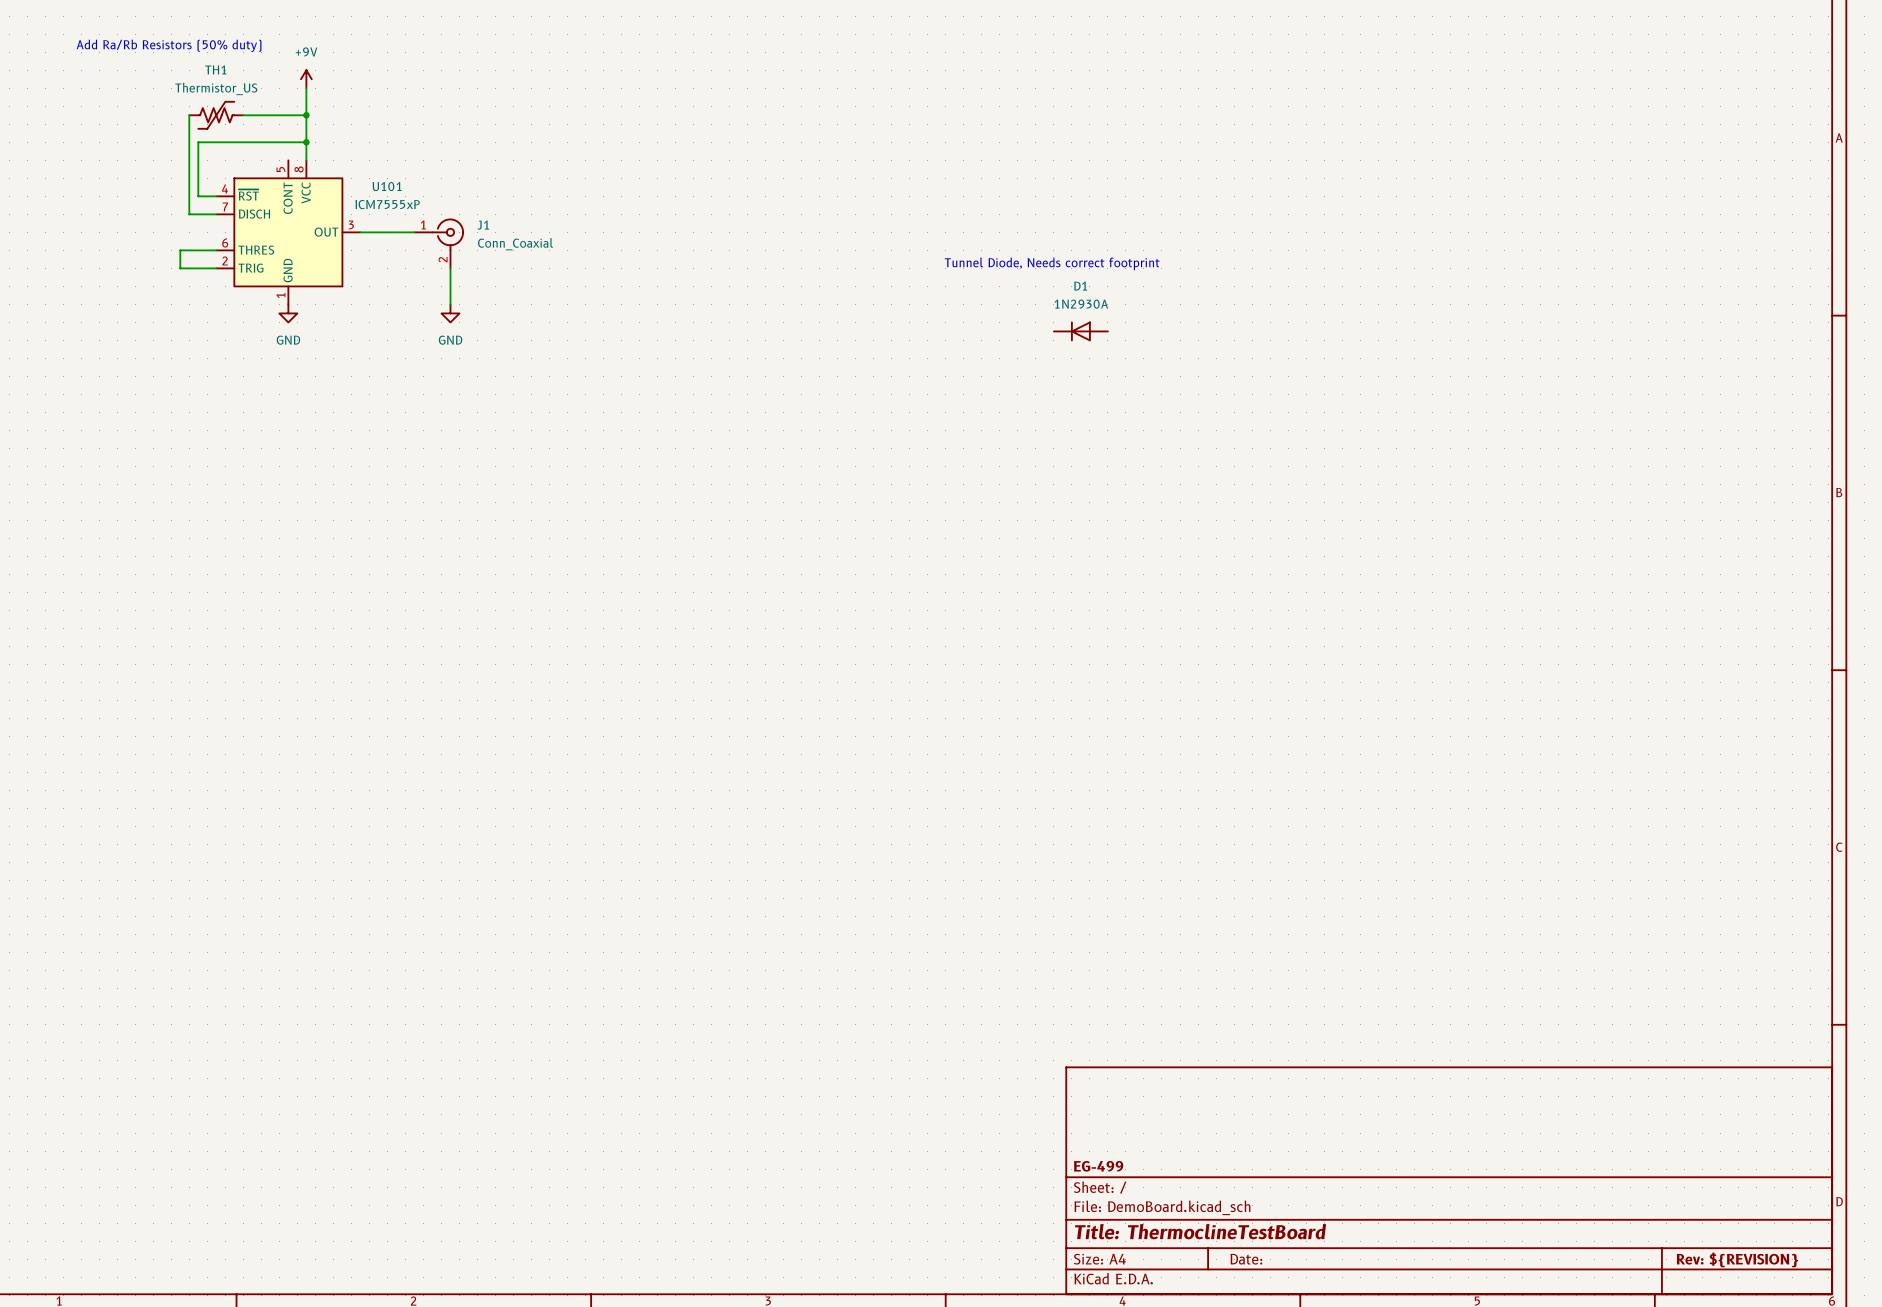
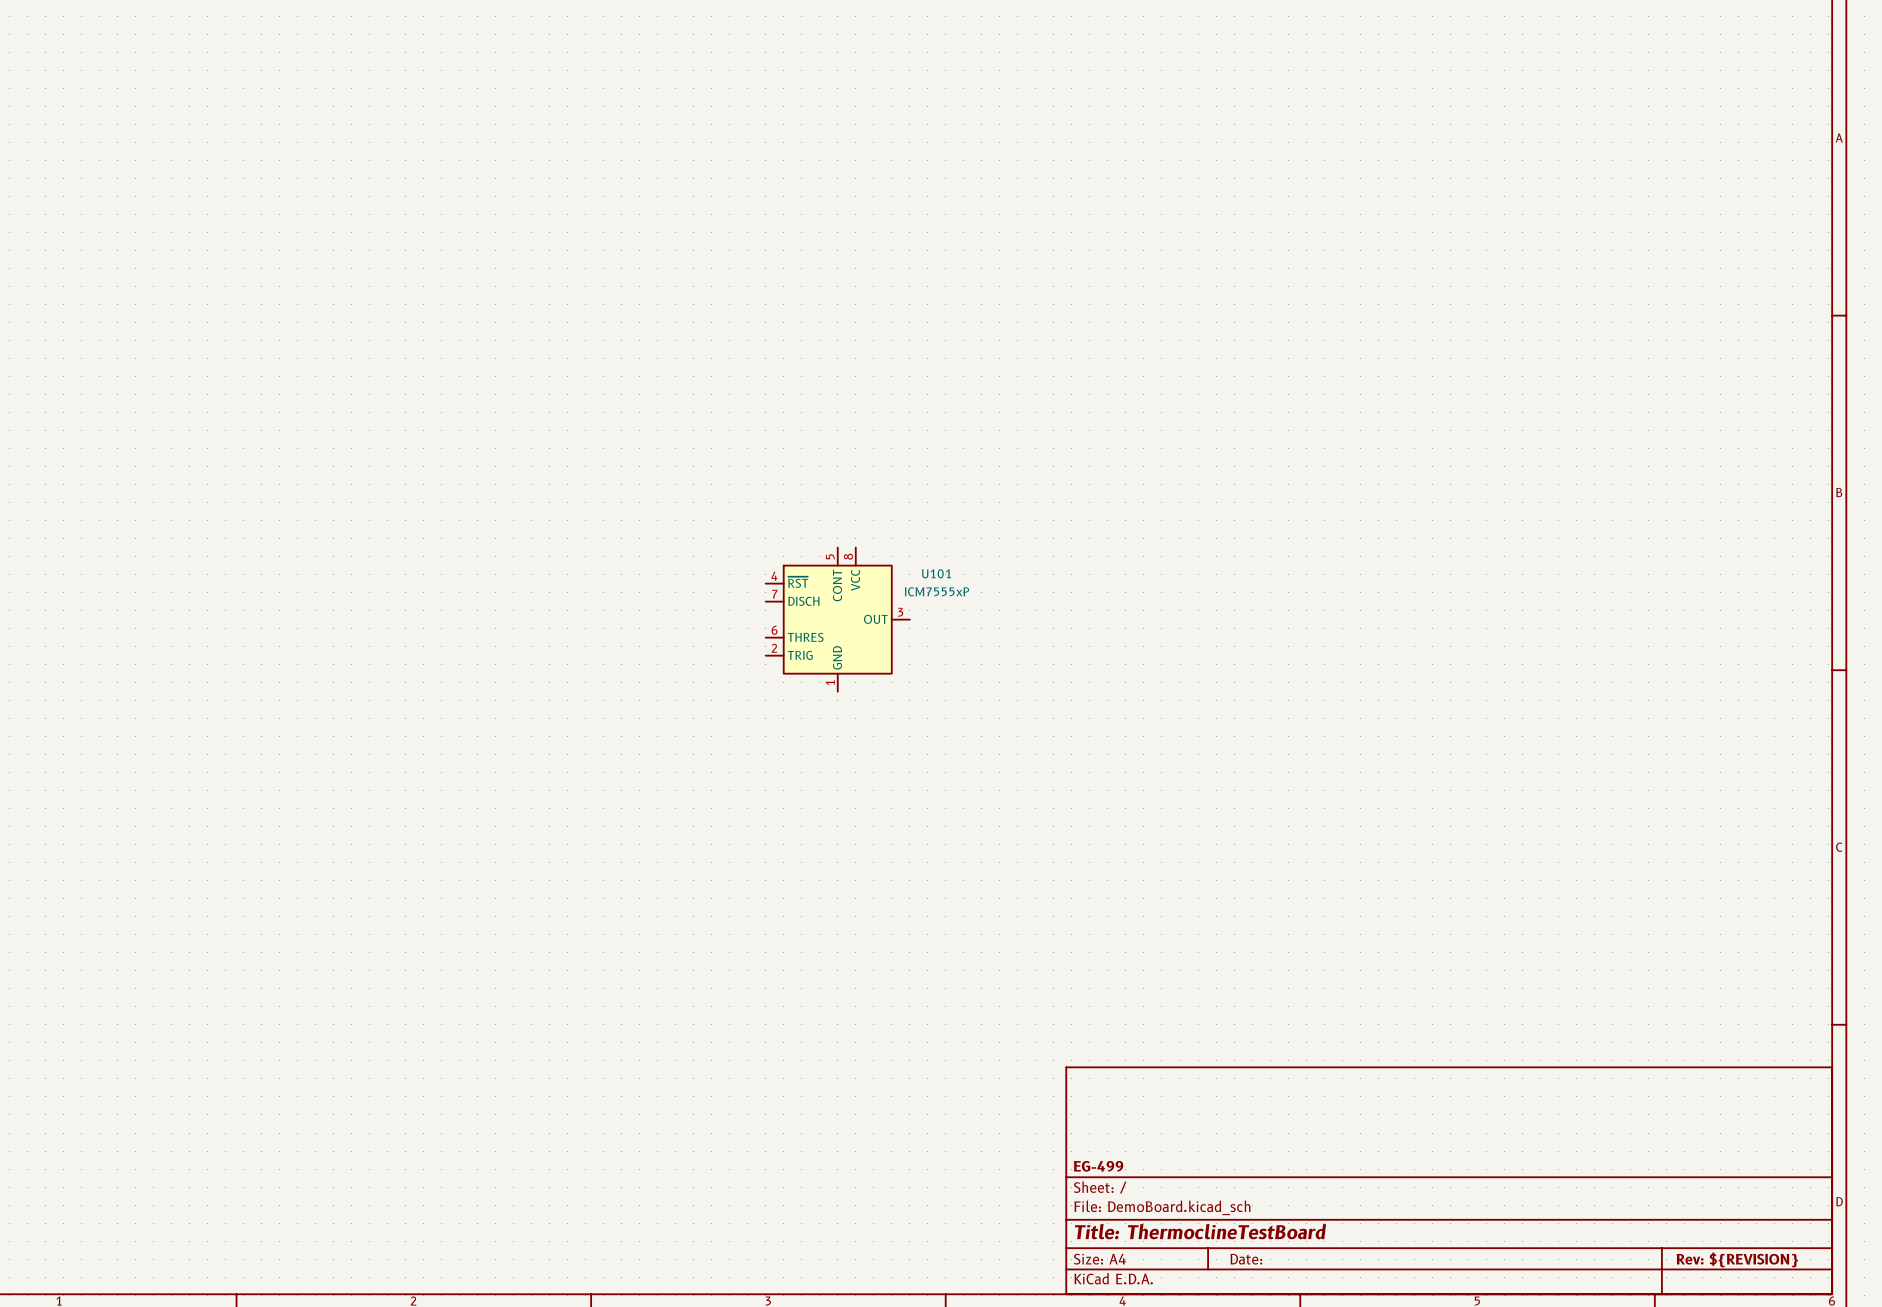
text: Add Ra/Rb Resistors (50% duty) (169, 45) -> none
power symbol: +9V (306, 79) -> none
wire: (306, 88) (306, 160) -> none
wire: (189, 115) (189, 214) (216, 214) -> none
TH1: Thermistor_US (216, 115) -> none
wire: (243, 115) (306, 115) -> none
junction: (306, 115) -> none
wire: (306, 142) (198, 142) (198, 196) (216, 196) -> none
junction: (306, 142) -> none
U101 position: (288, 232) -> (837, 619)
wire: (360, 232) (414, 232) -> none
J1: Conn_Coaxial (439, 243) -> none
wire: (216, 250) (180, 250) (180, 268) (216, 268) -> none
text: Tunnel Diode, Needs correct footprint (1052, 263) -> none
wire: (450, 268) (450, 304) -> none
power symbol: GND (288, 313) -> none
power symbol: GND (450, 313) -> none
D1: 1N2930A (1080, 331) -> none

